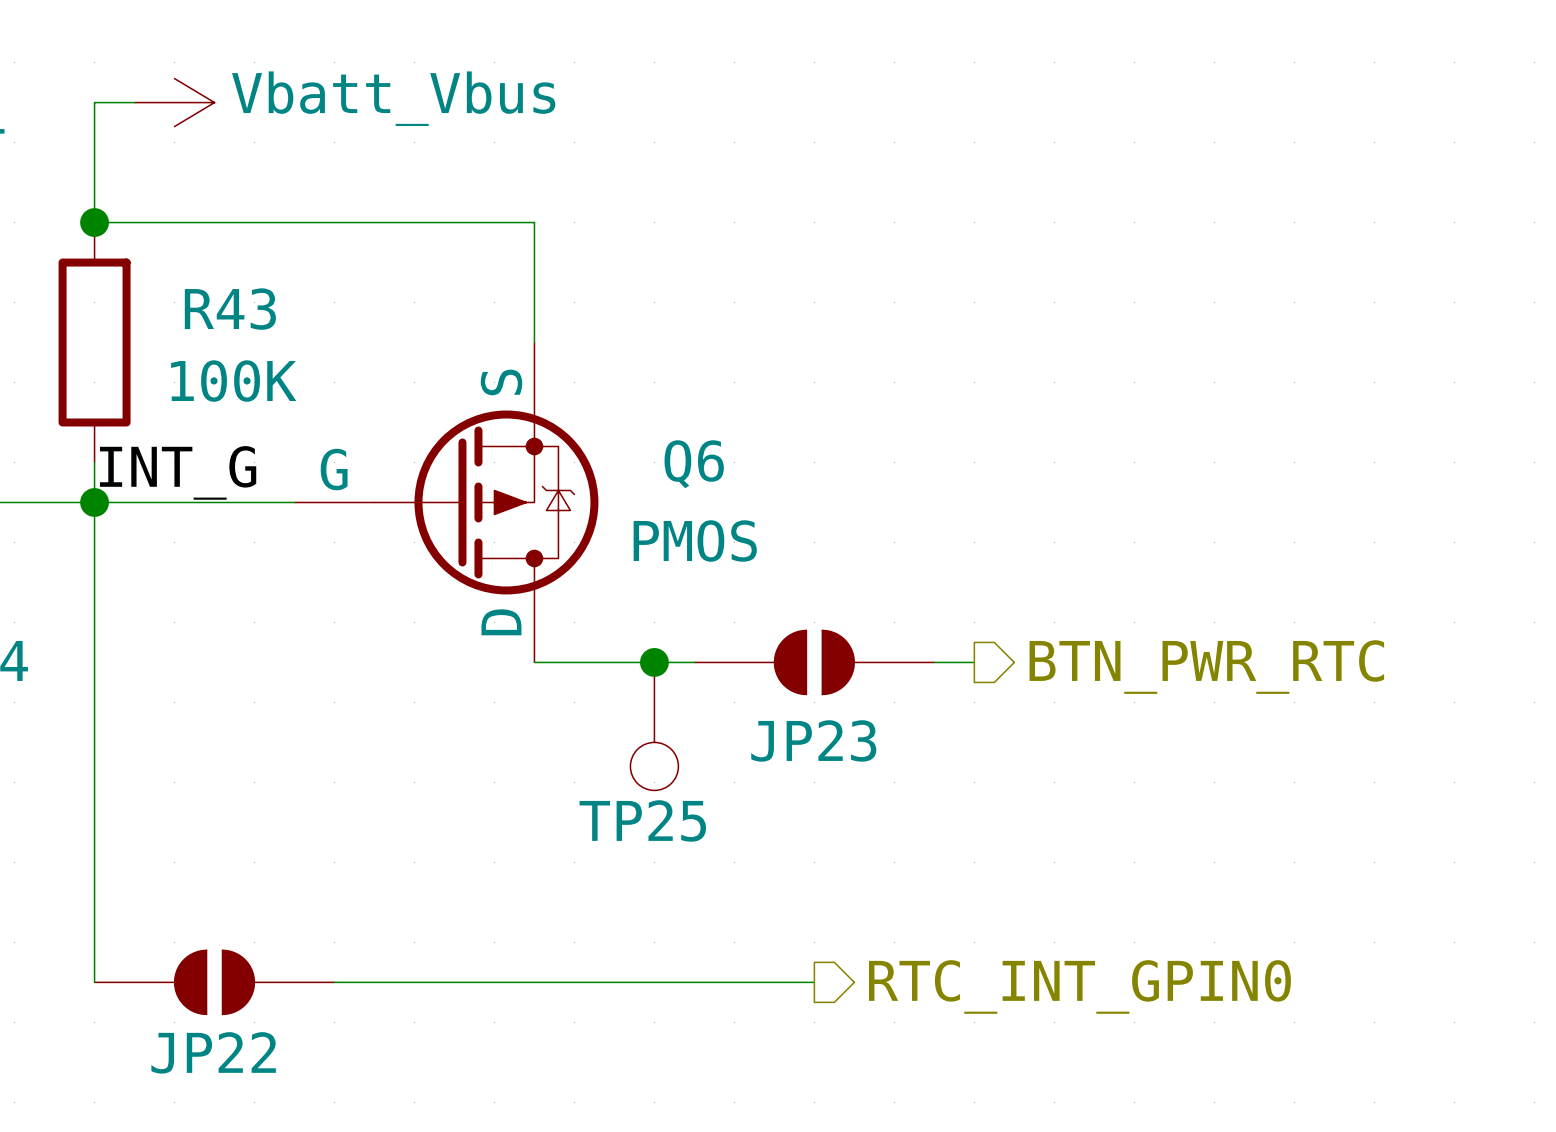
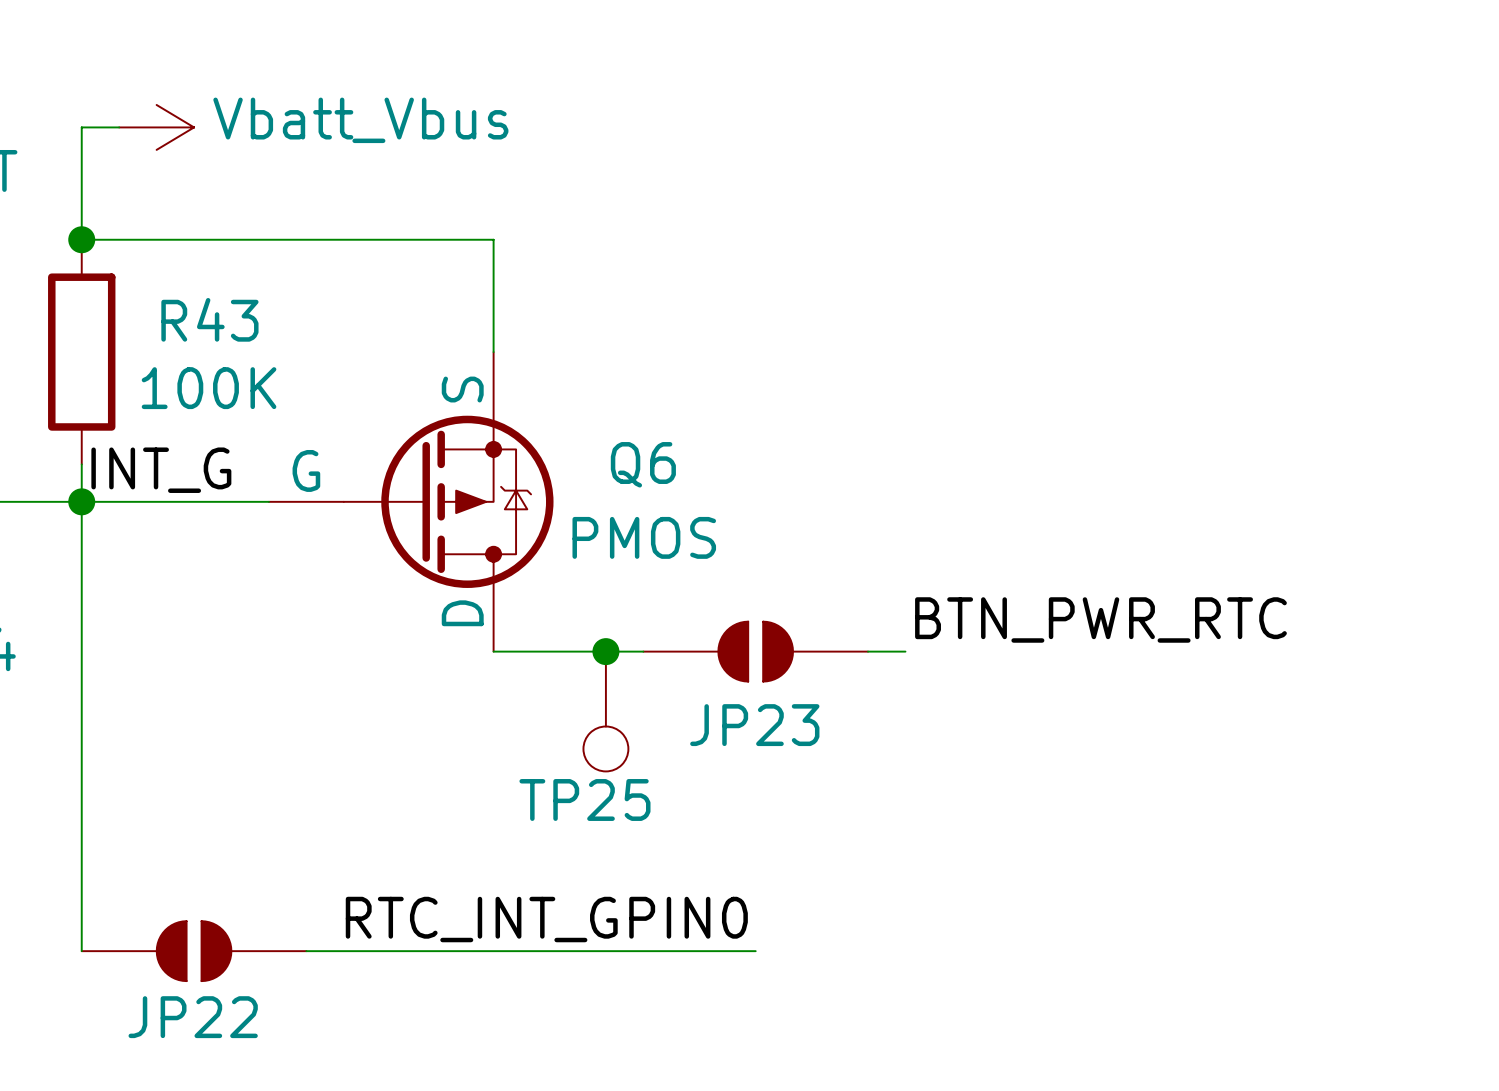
label: none -> BTN_PWR_RTC (1100, 619)
hierarchical label: BTN_PWR_RTC (1206, 667) -> none
label: none -> RTC_INT_GPIN0 (546, 919)
hierarchical label: RTC_INT_GPIN0 (1079, 986) -> none

